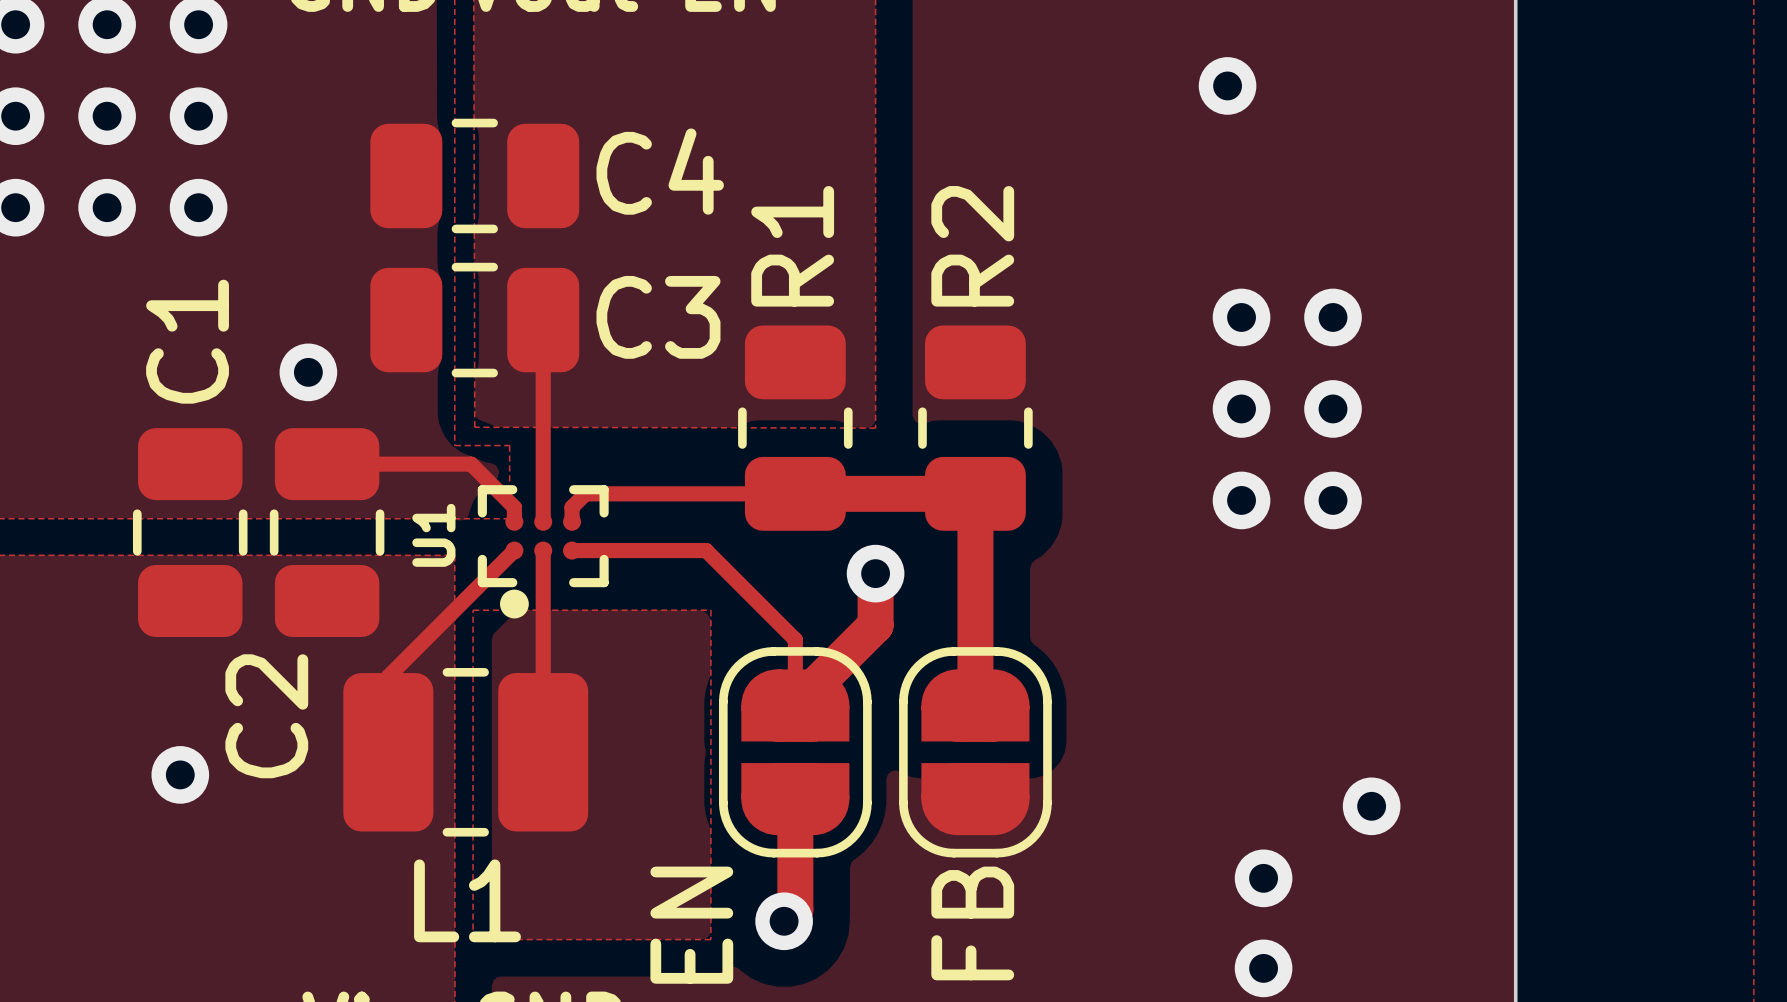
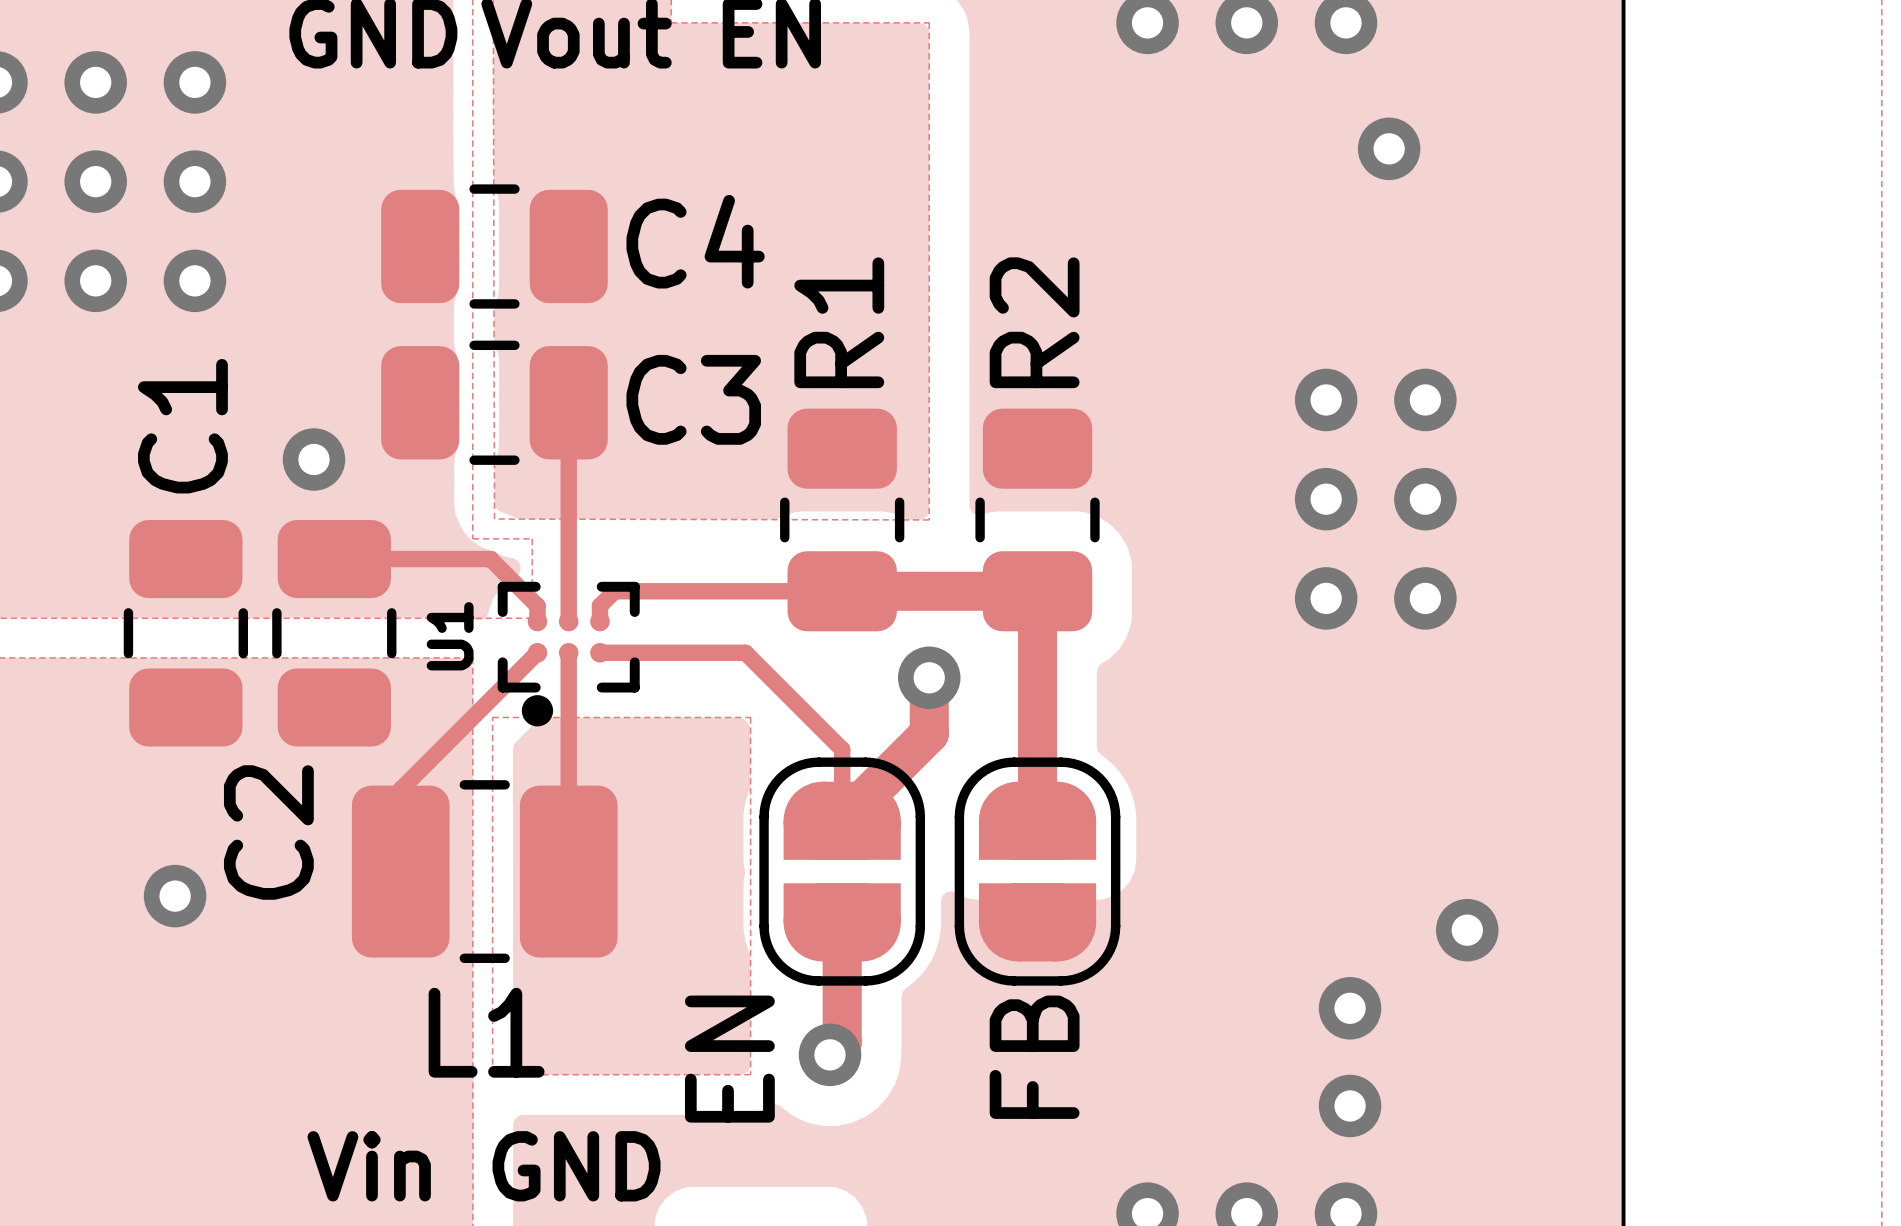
via position: (1227, 85) -> (1389, 148)

